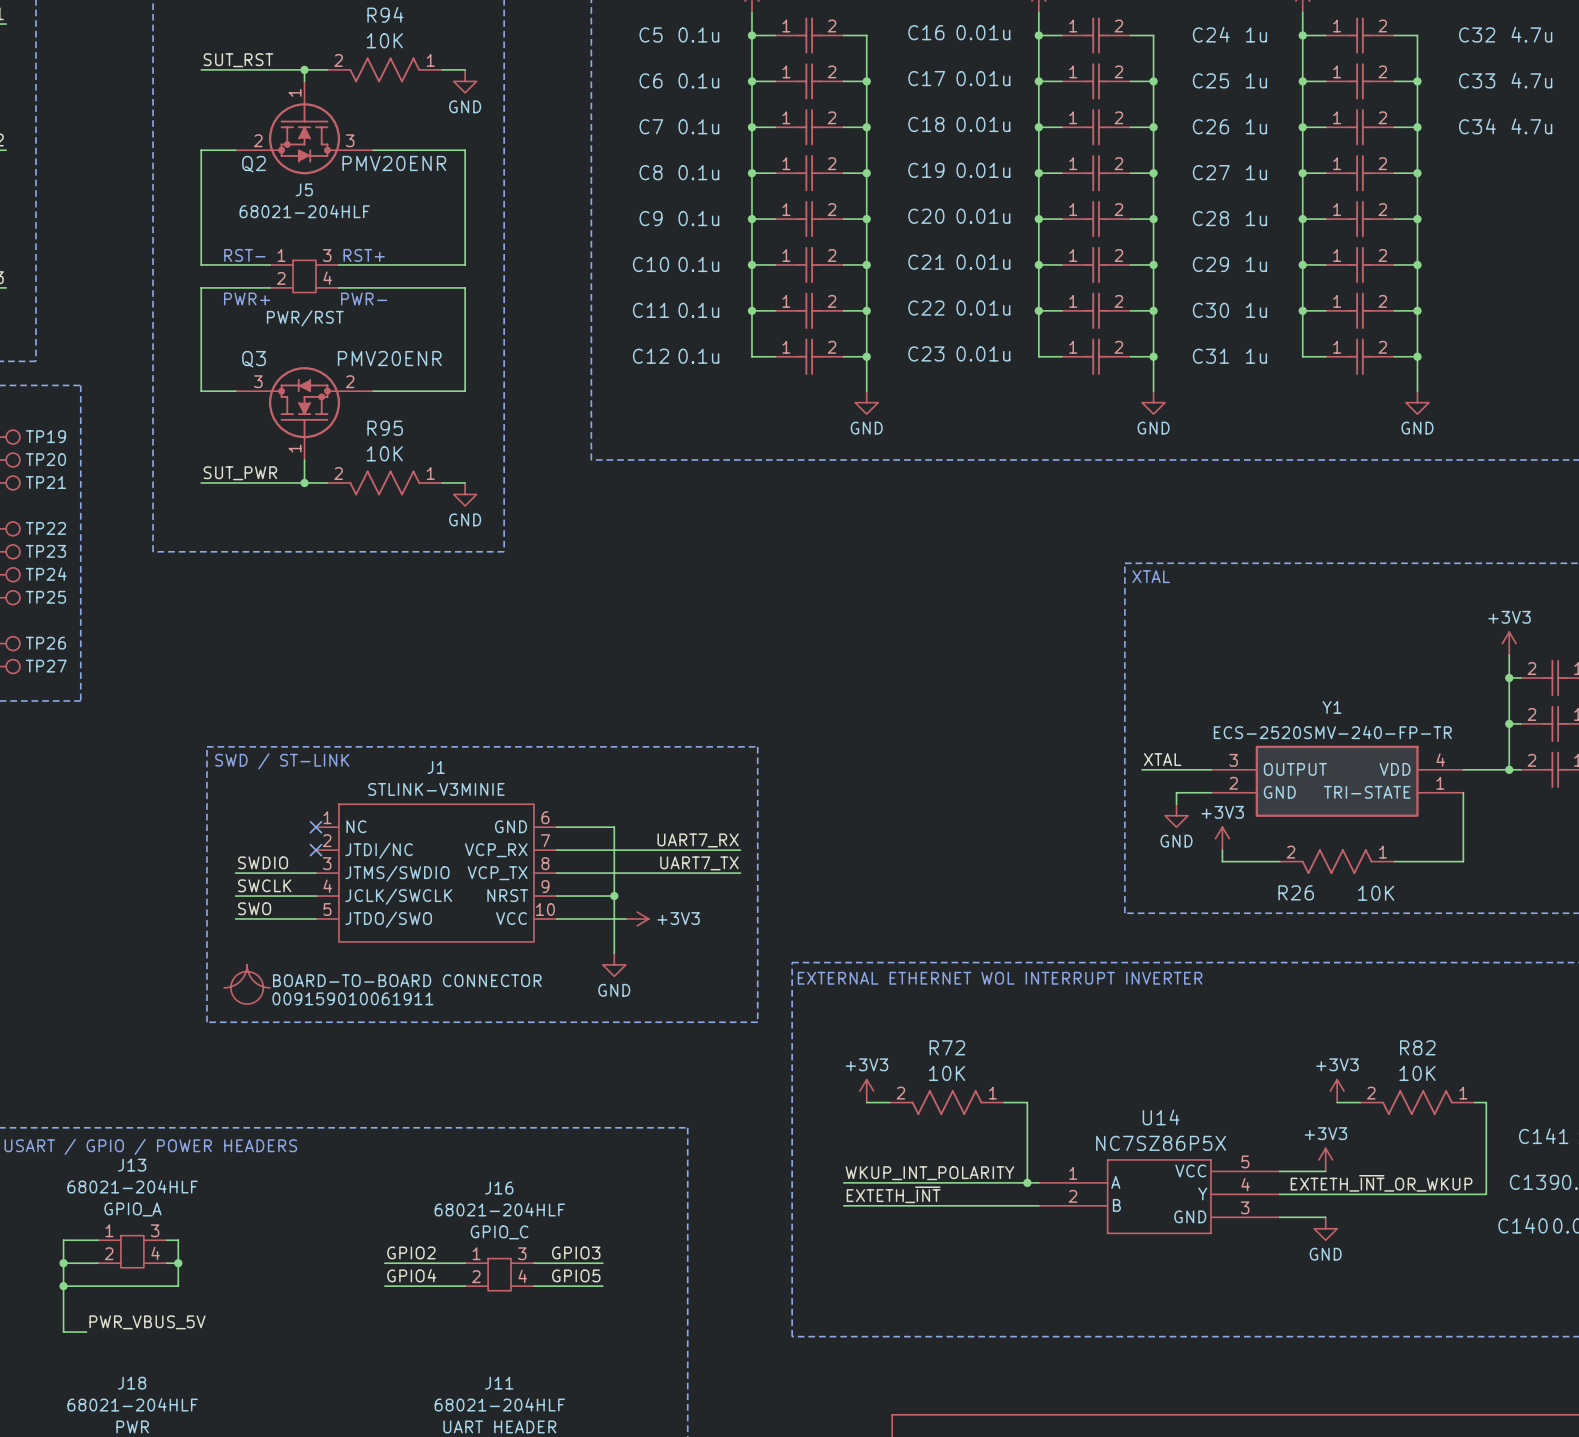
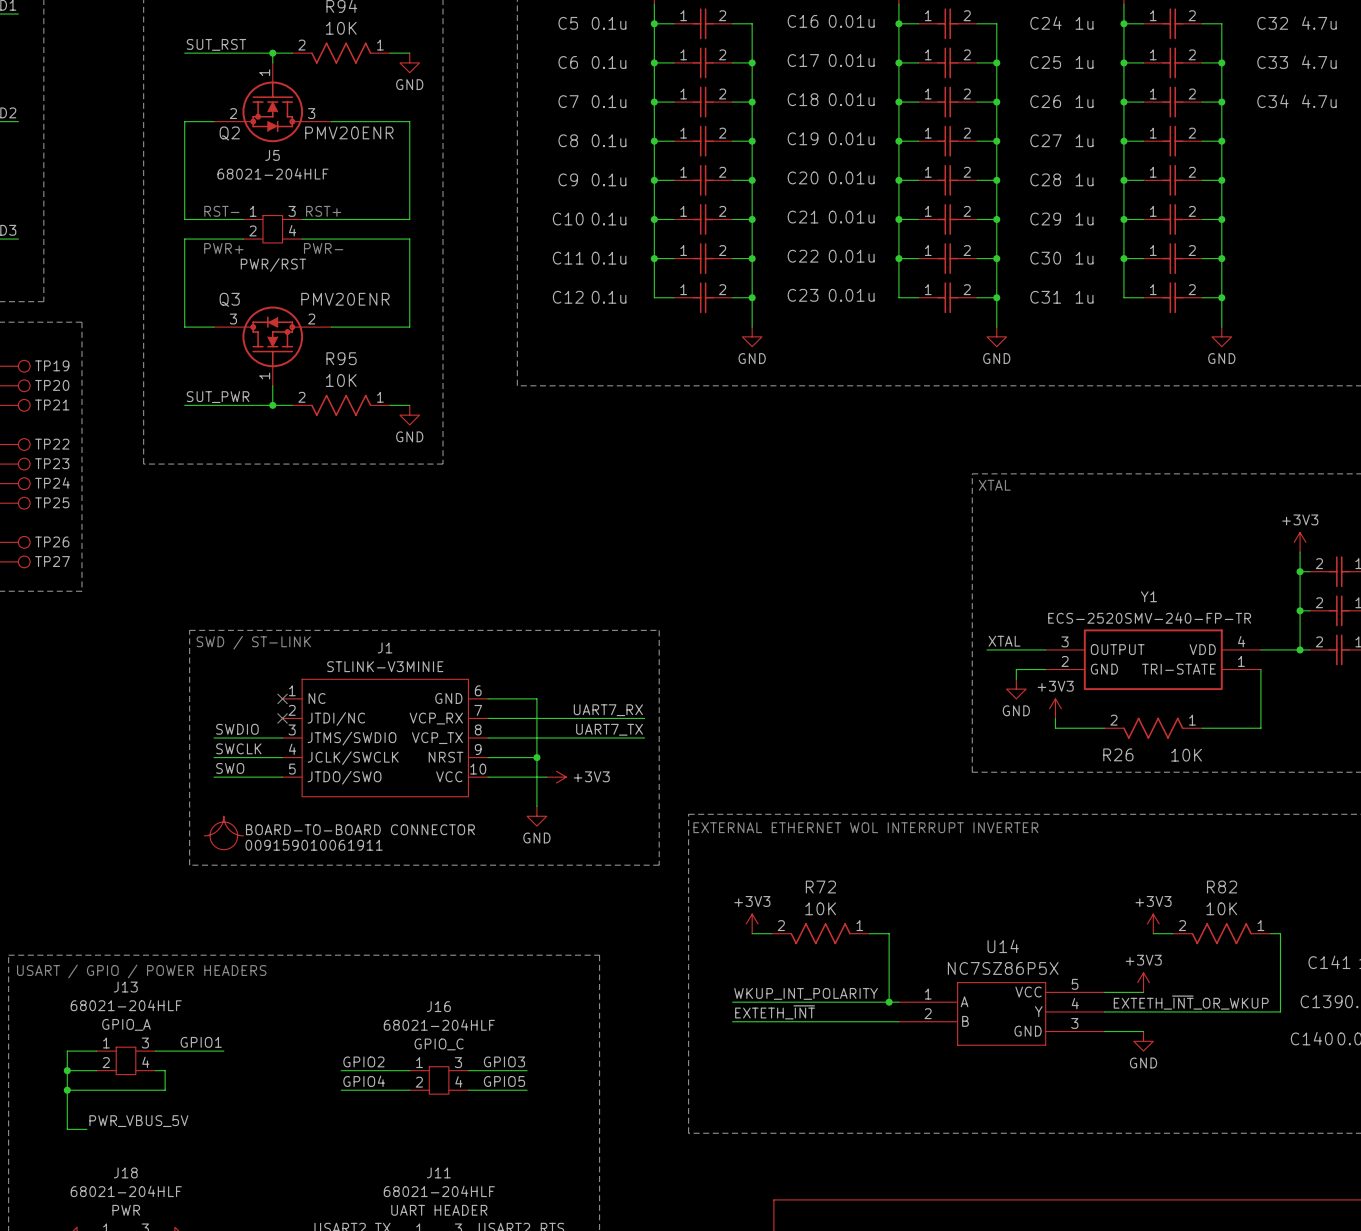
label: none -> GPIO1 (201, 1042)
wire: (178, 1240) (178, 1263) -> (165, 1051) (223, 1051)
junction: (178, 1263) -> none

